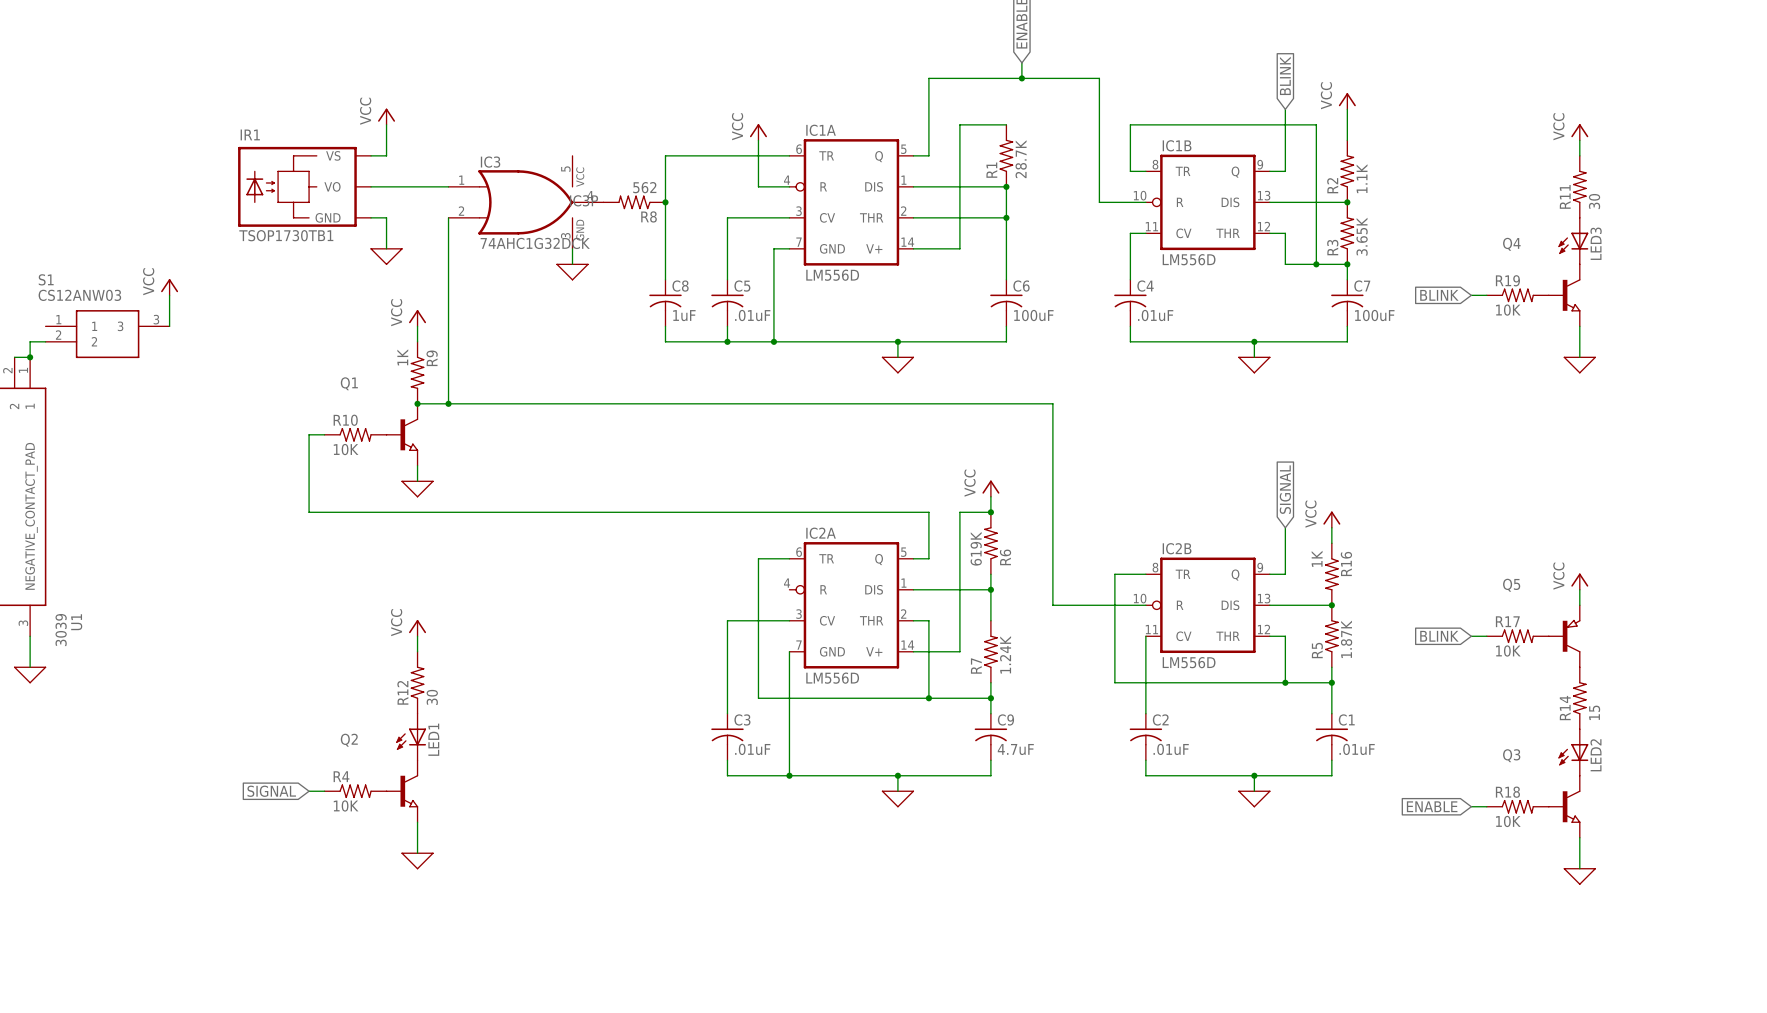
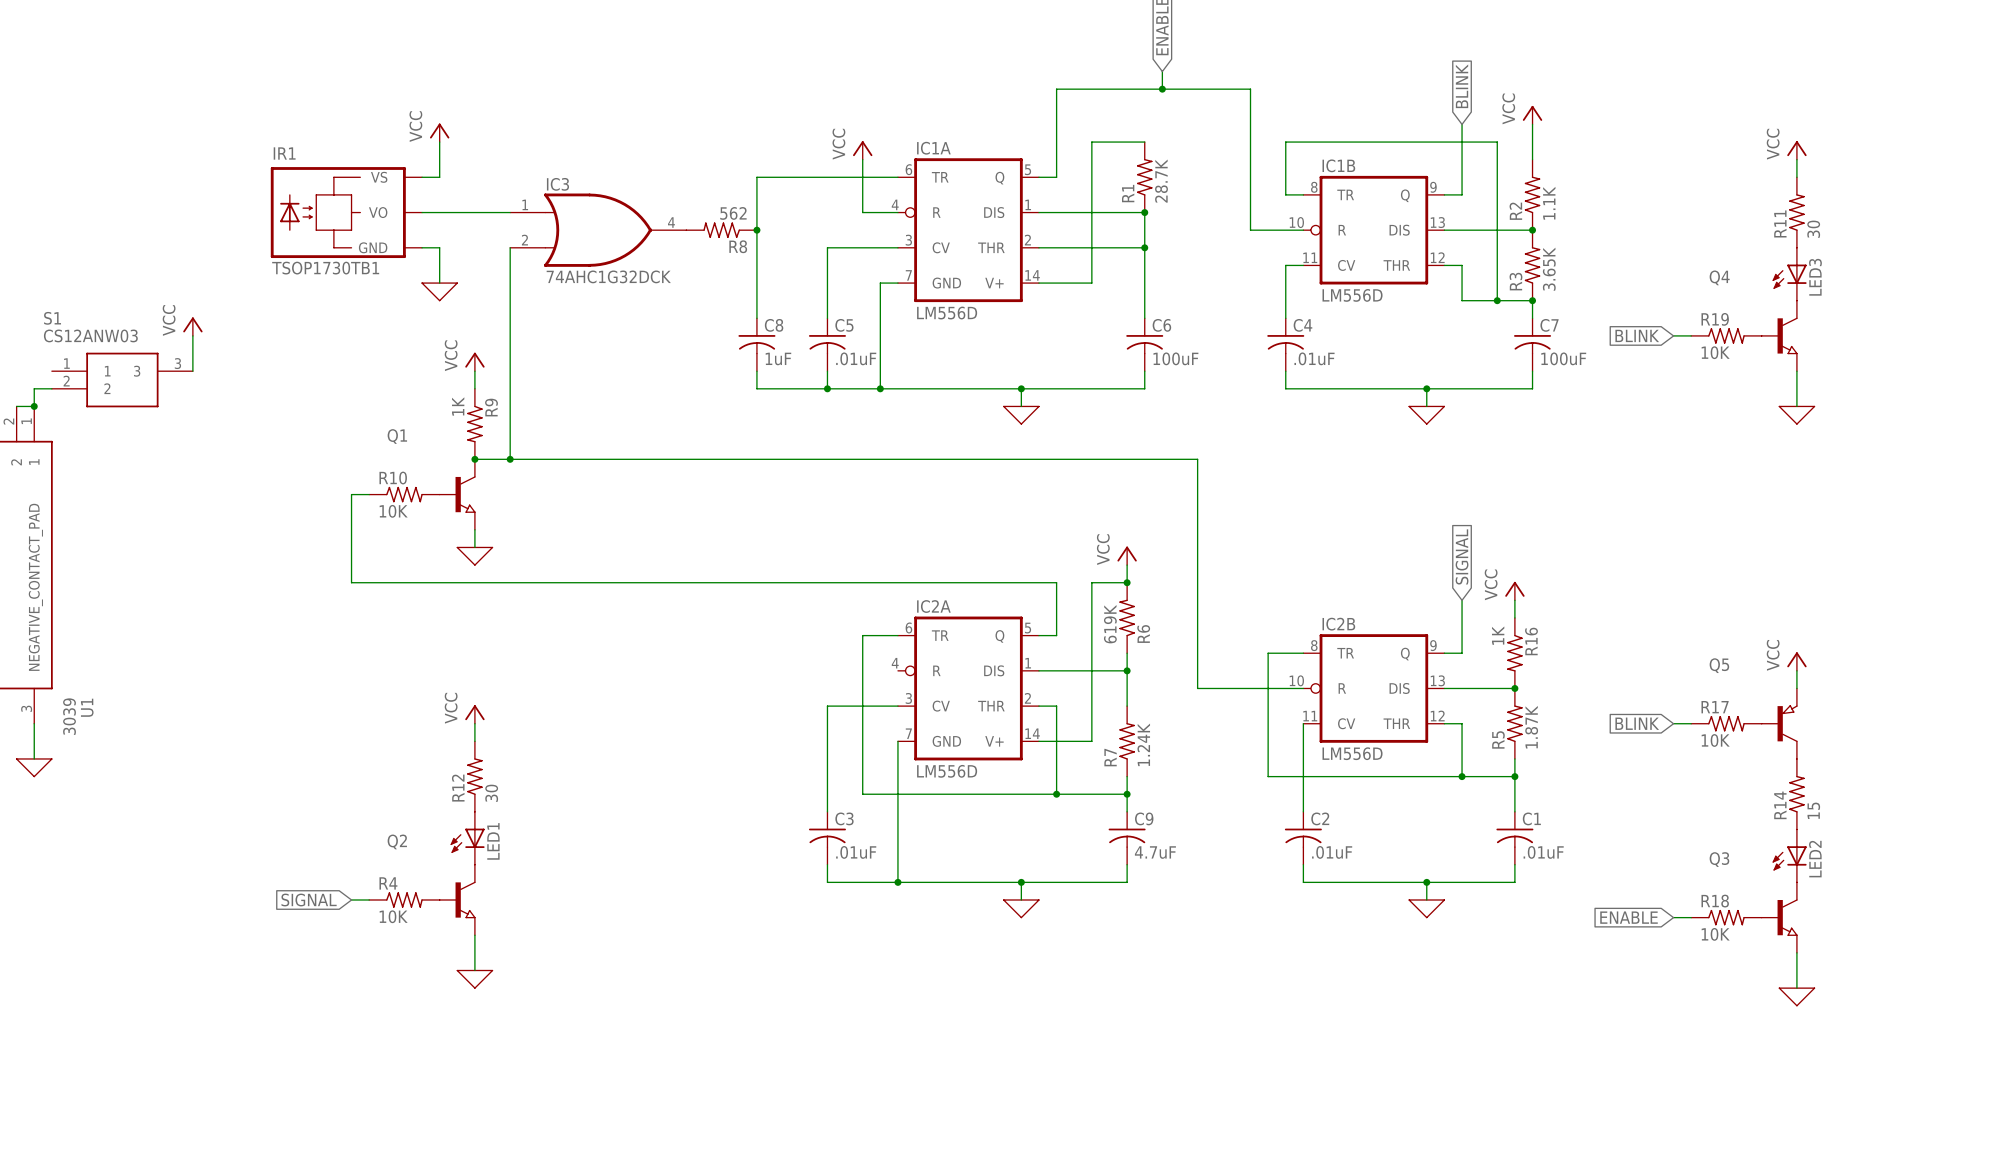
IC3P: (572, 202) -> none
wire: (572, 248) (572, 264) -> none
power symbol: (572, 272) -> none

